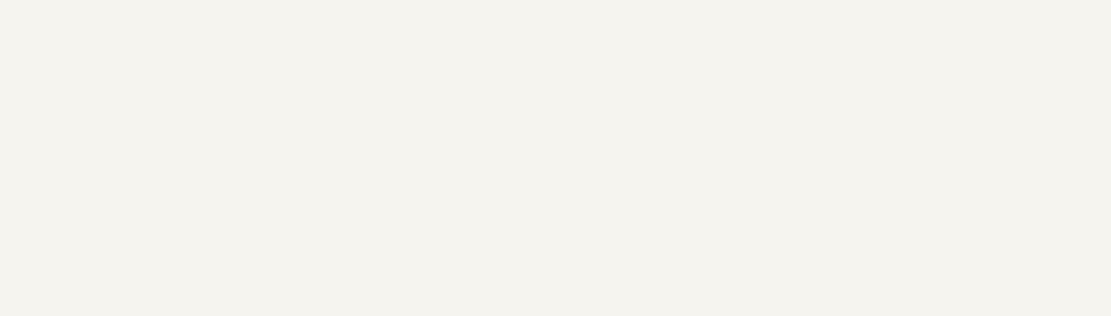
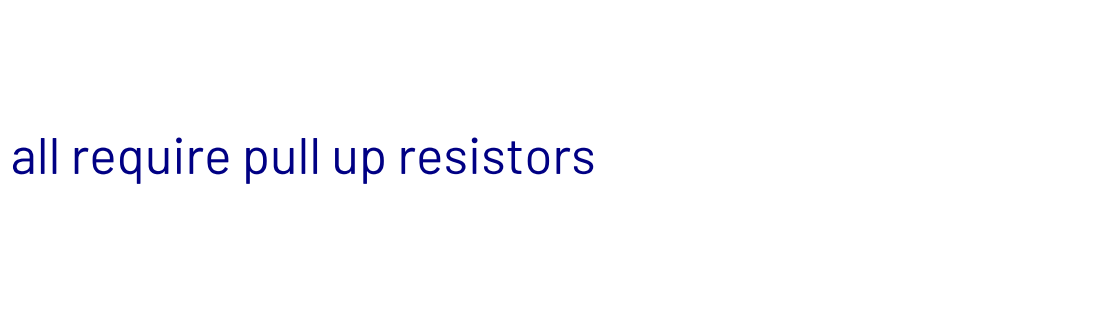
text: none -> all require pull up resistors (303, 160)

